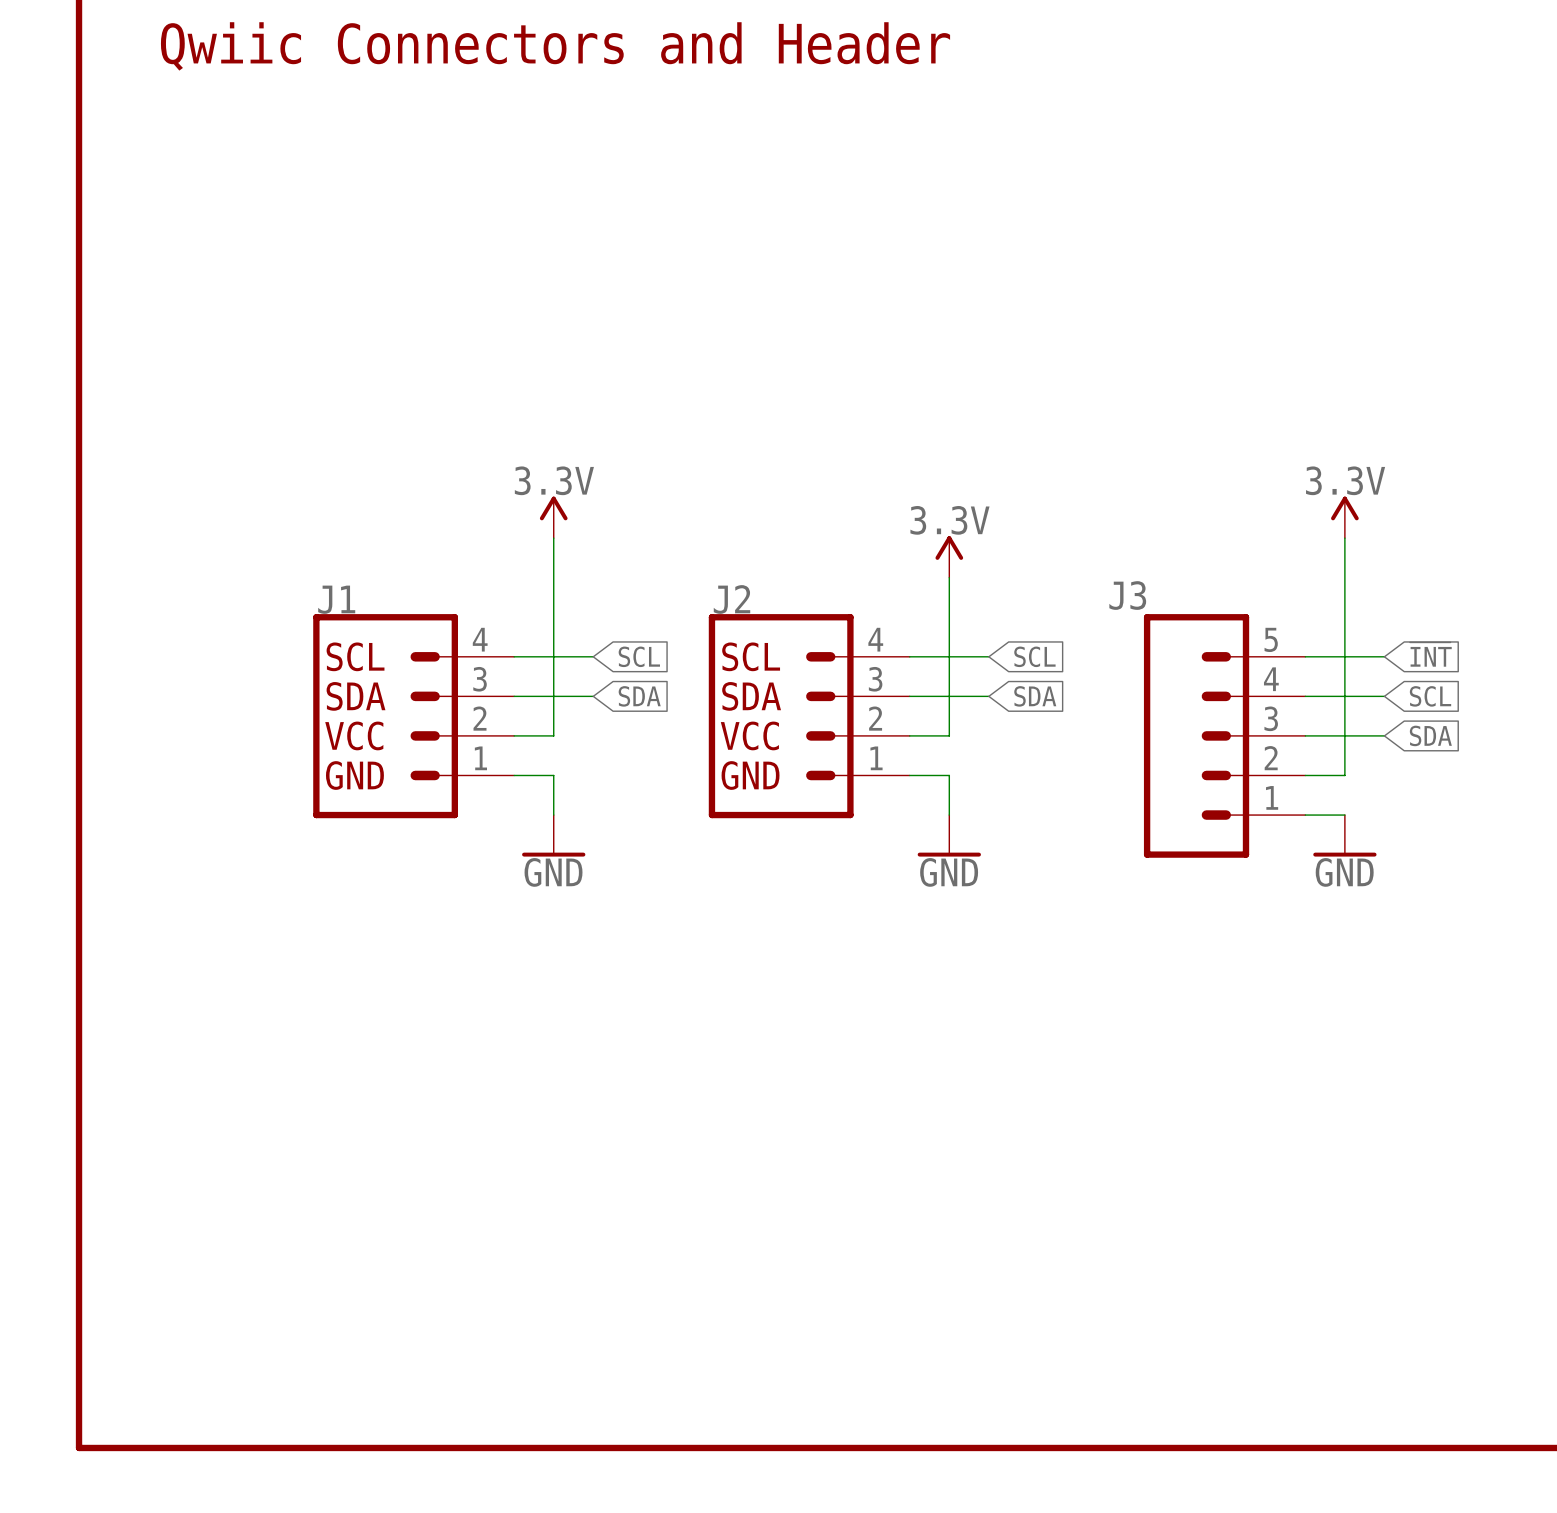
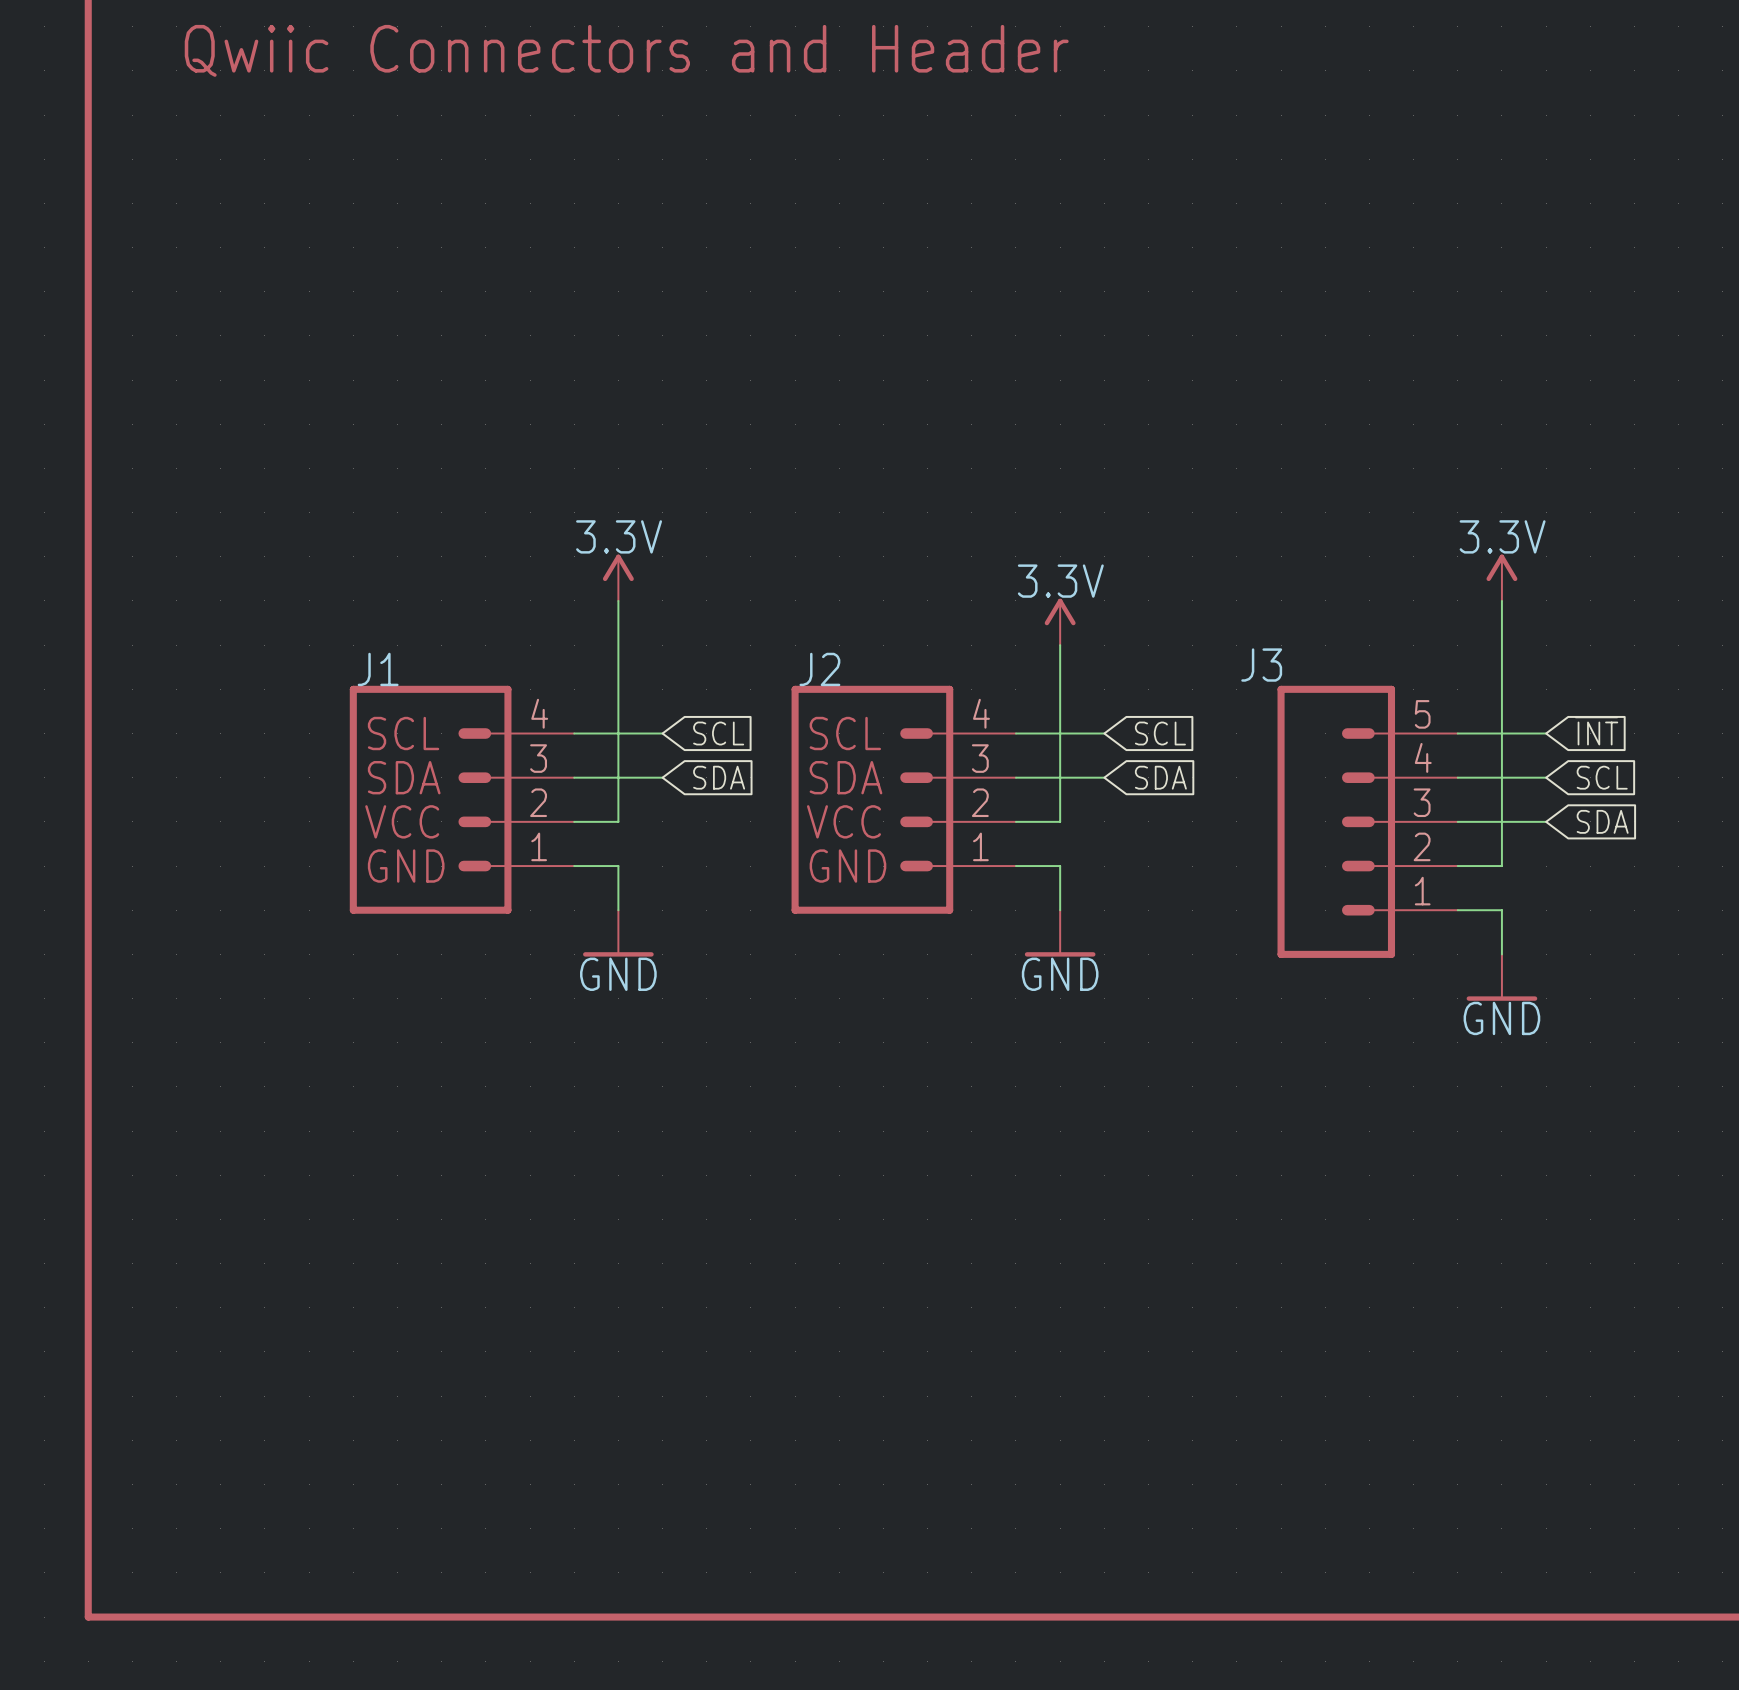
power symbol position: GND (1344, 835) -> GND (1501, 977)

